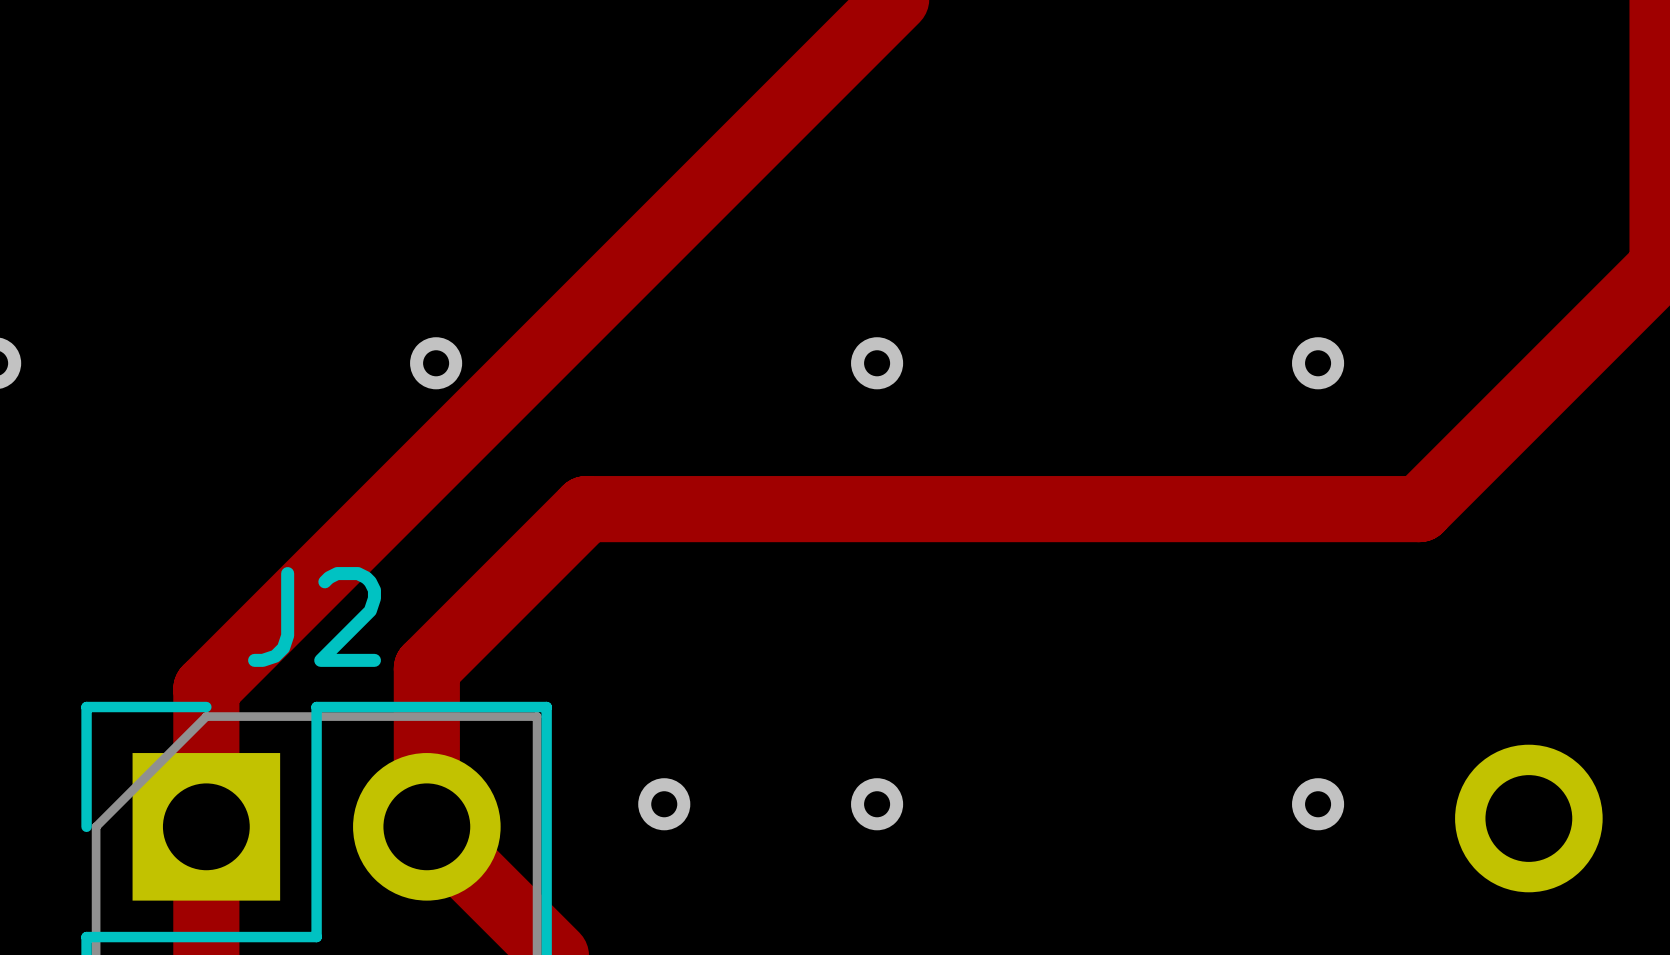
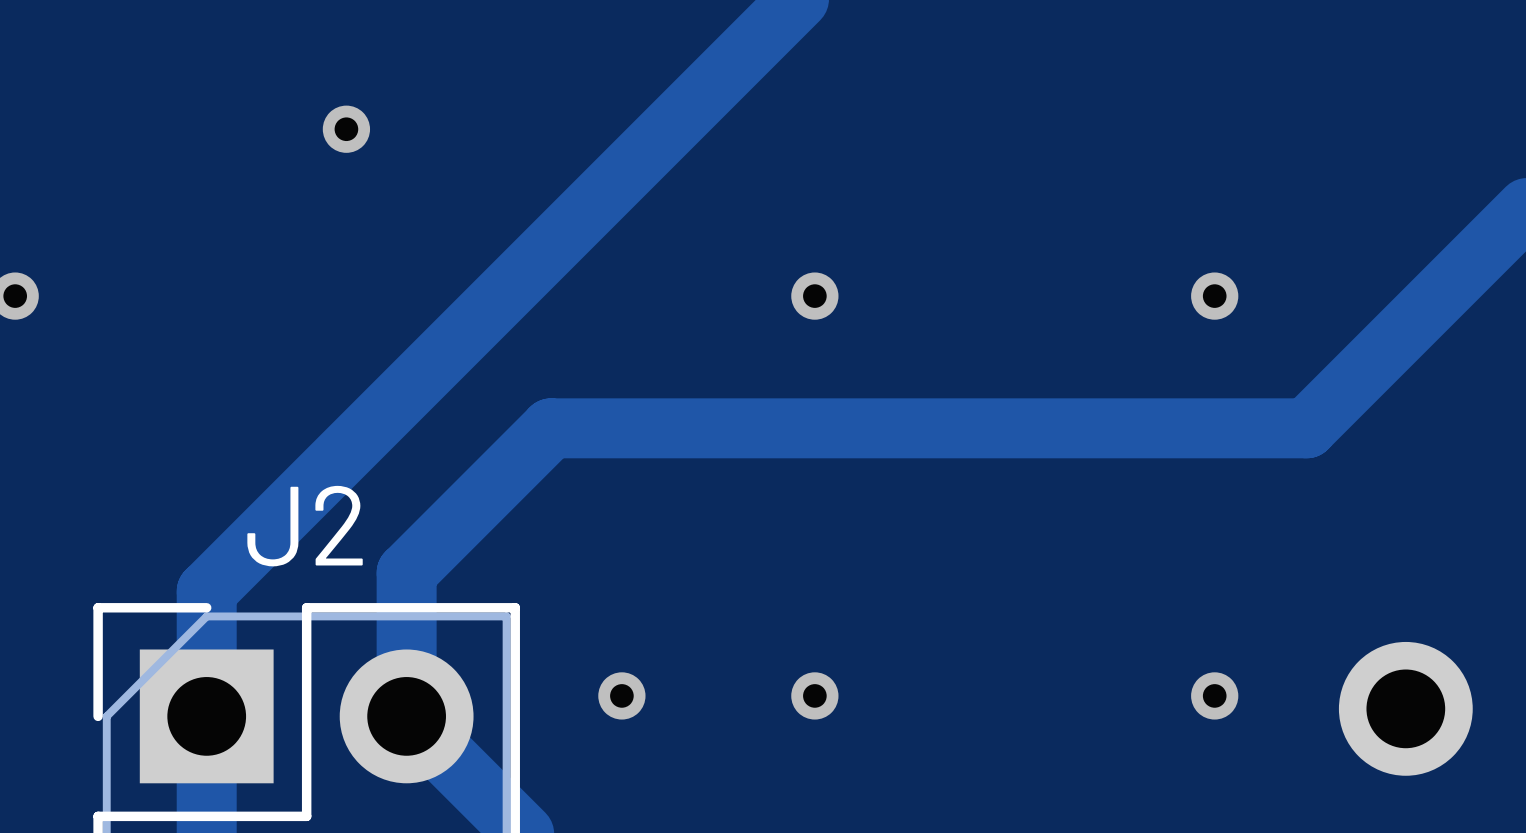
via position: (436, 363) -> (346, 129)

